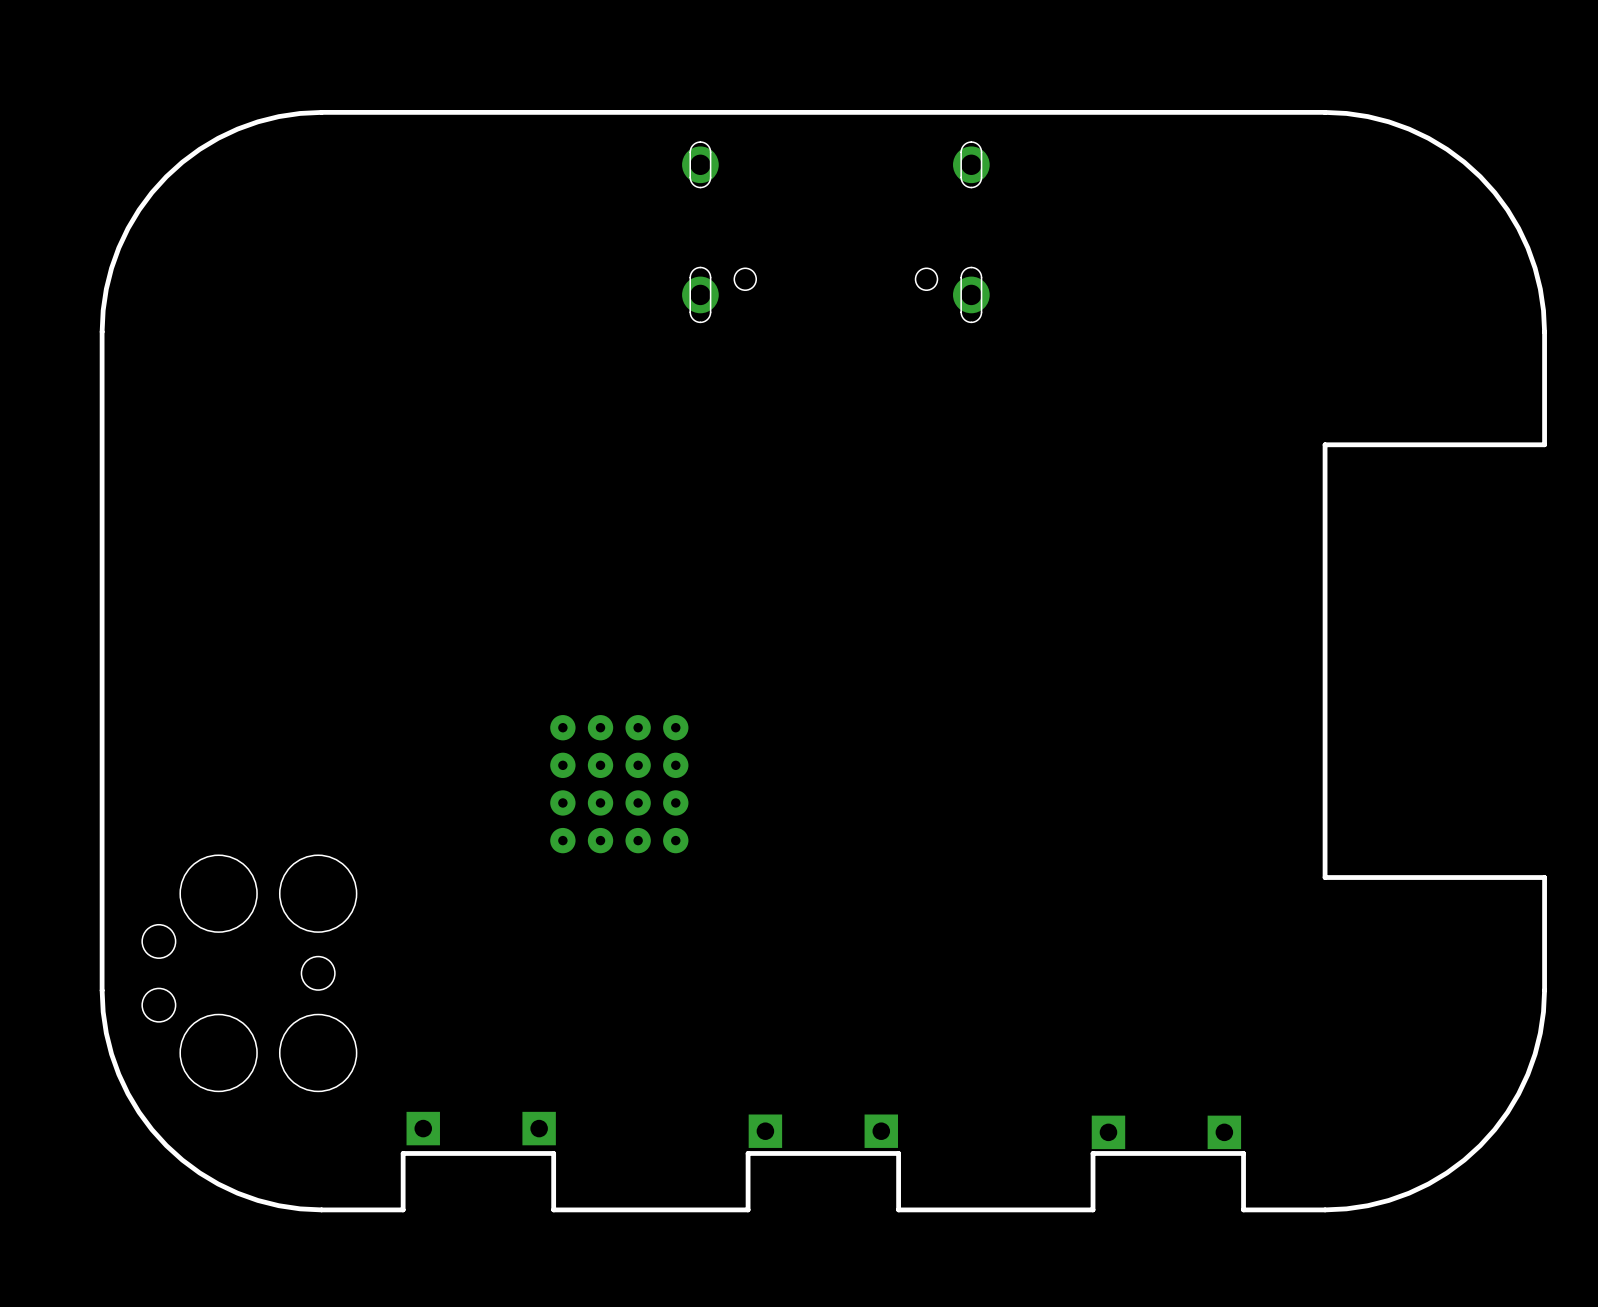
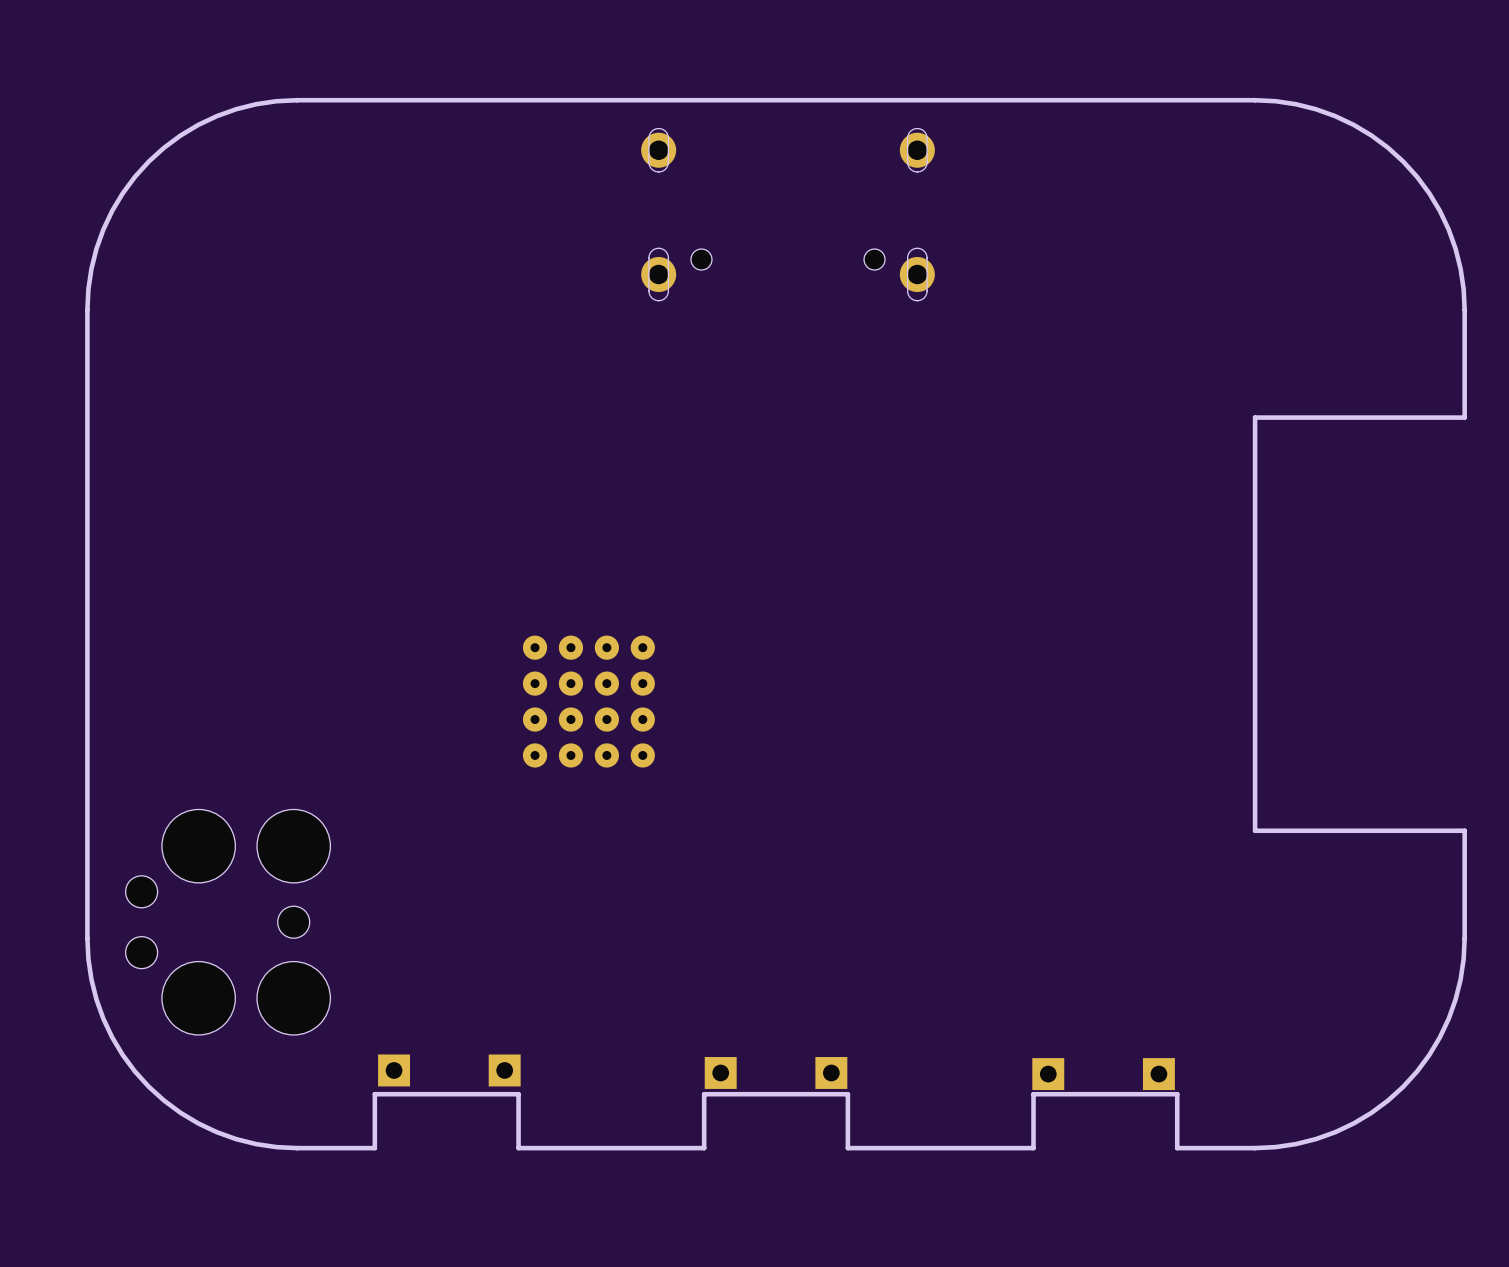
part position: (619, 784) -> (588, 701)

